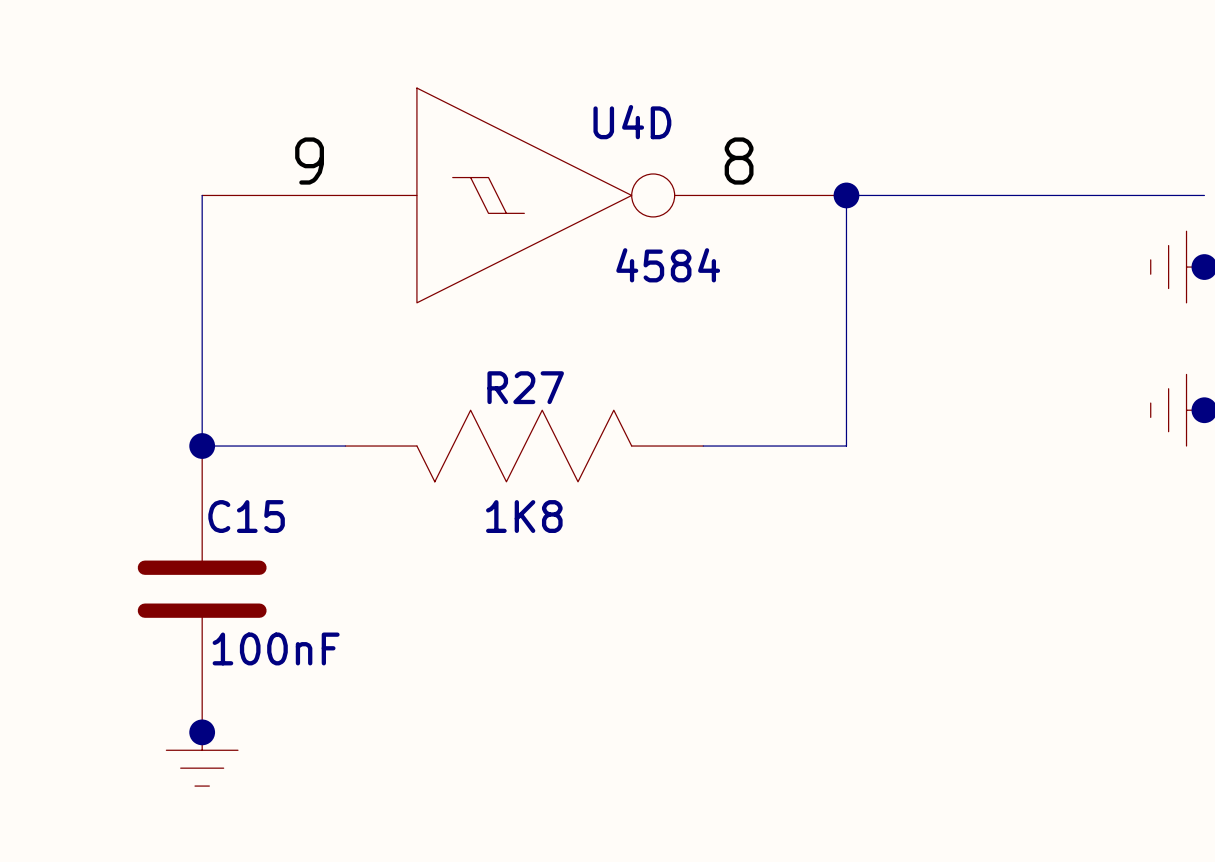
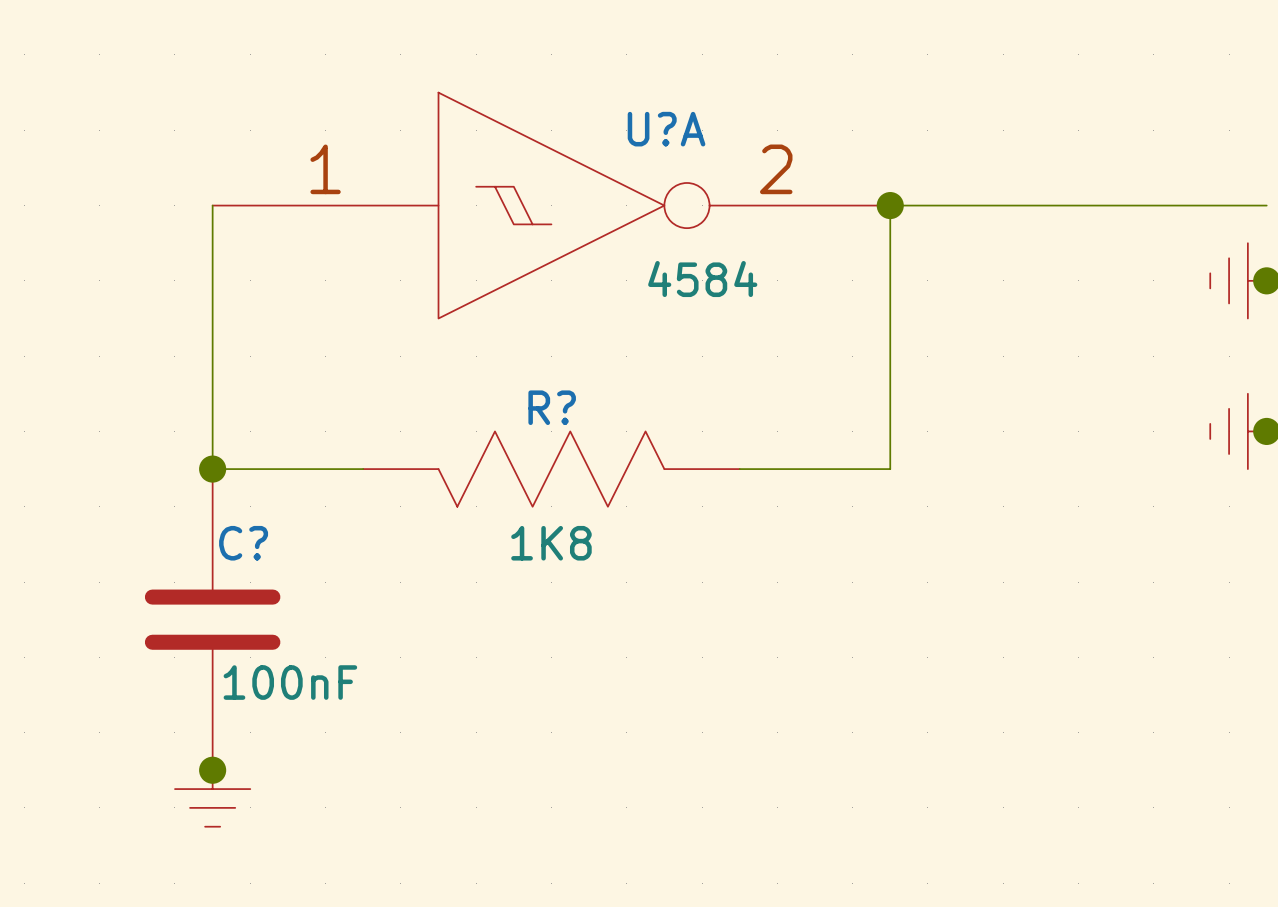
U4D name: U4D (632, 122) -> U?A (666, 129)
U4D pin number: 9 (309, 161) -> 1 (325, 169)
U4D pin number: 8 (739, 161) -> 2 (776, 169)
R27 name: R27 (525, 387) -> R? (552, 407)
C15 name: C15 (246, 516) -> C? (243, 543)

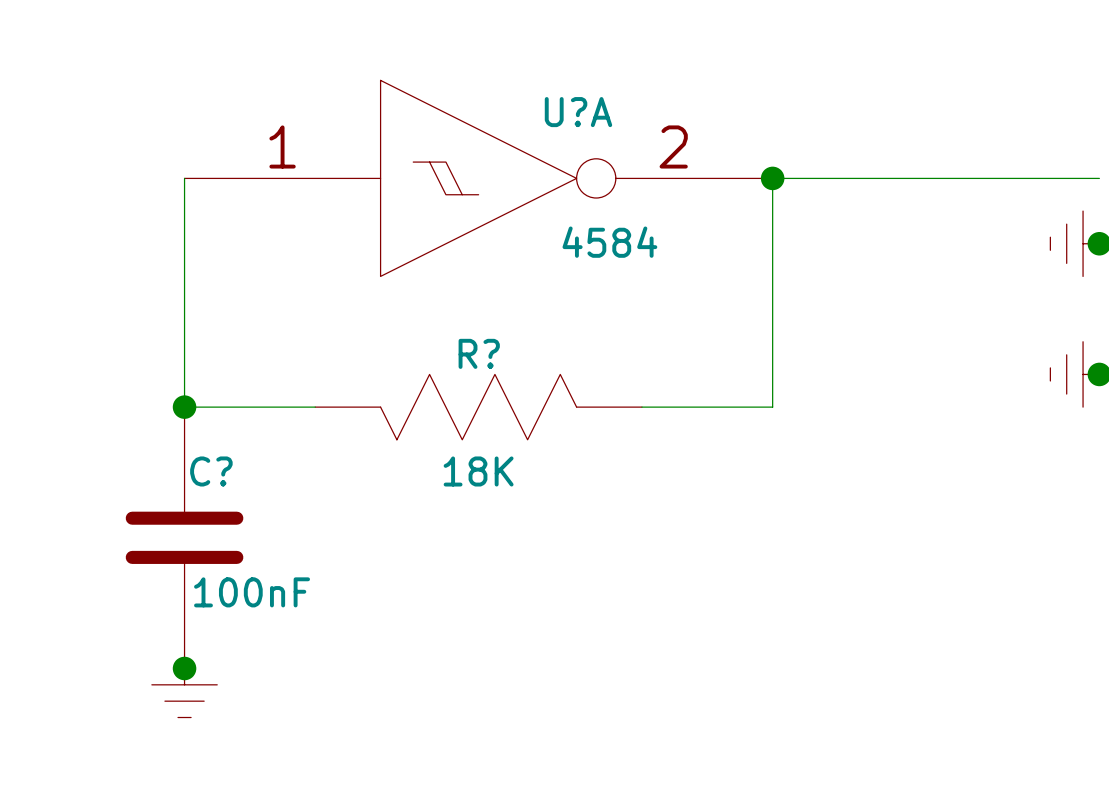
R? value: 1K8 (551, 543) -> 18K (478, 471)

